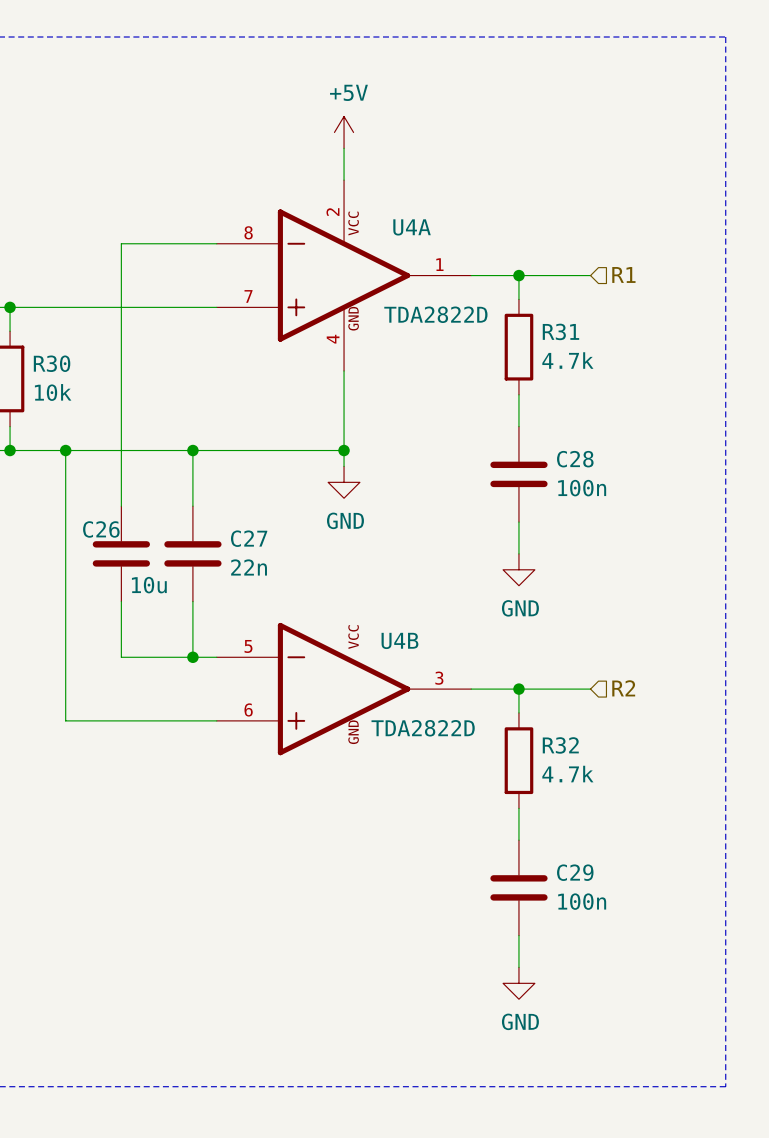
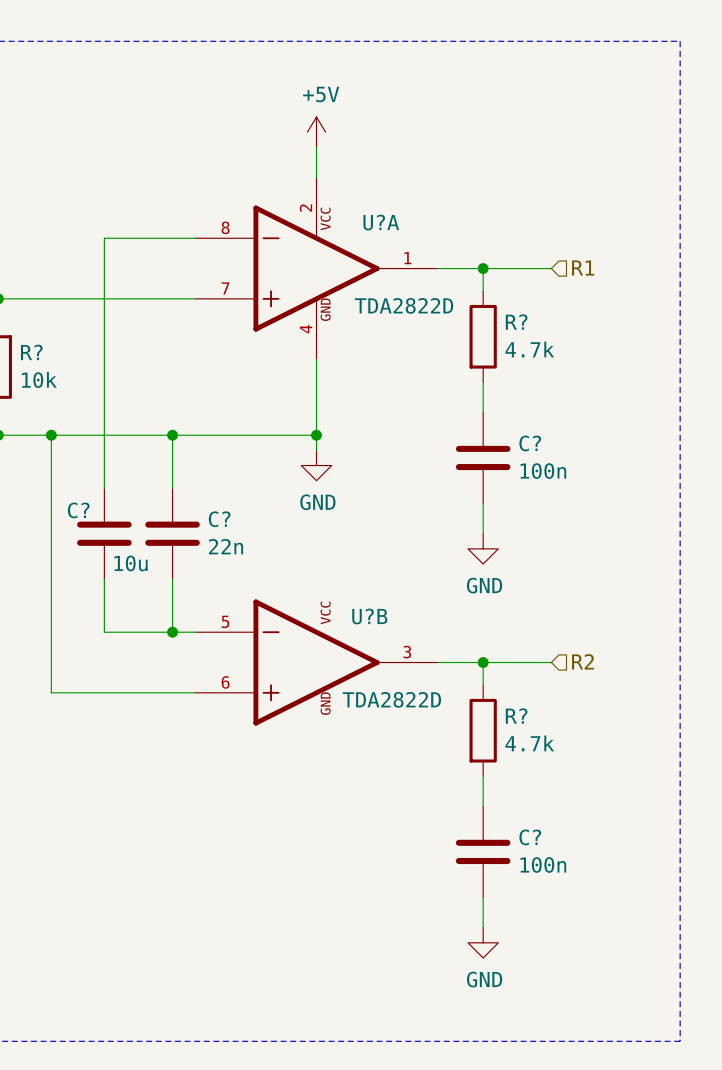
U4A name: U4A (412, 227) -> U?A (381, 222)
R31 name: R31 (560, 331) -> R? (516, 322)
R30 name: R30 (52, 363) -> R? (31, 352)
C28 name: C28 (575, 459) -> C? (530, 443)
C26 name: C26 (101, 529) -> C? (78, 510)
C27 name: C27 (249, 538) -> C? (219, 519)
U4B name: U4B (399, 640) -> U?B (369, 616)
R32 name: R32 (560, 745) -> R? (516, 716)
C29 name: C29 (575, 872) -> C? (530, 837)

